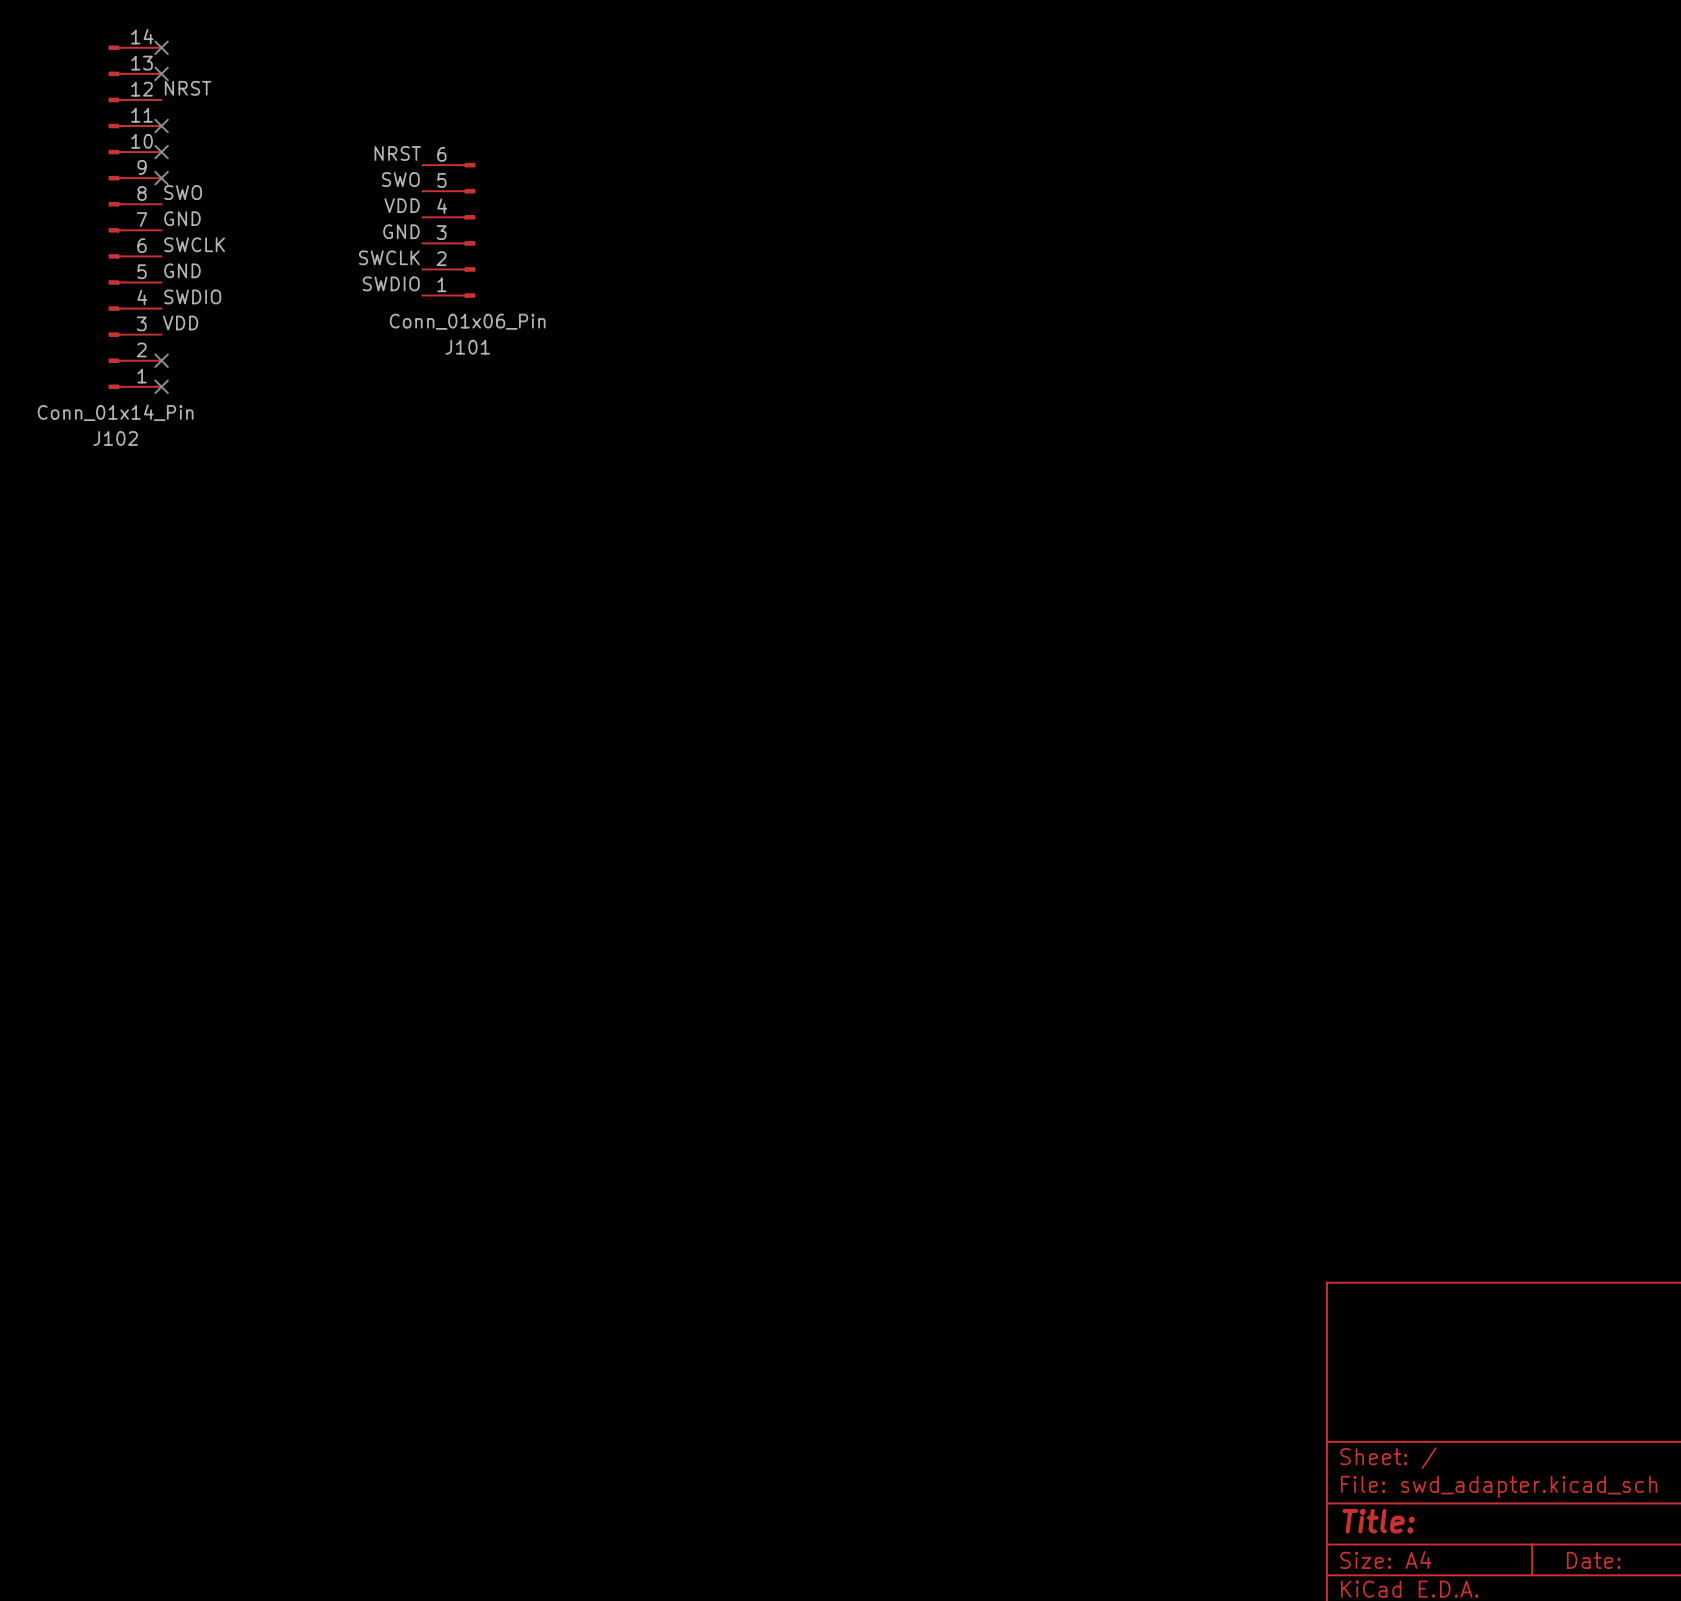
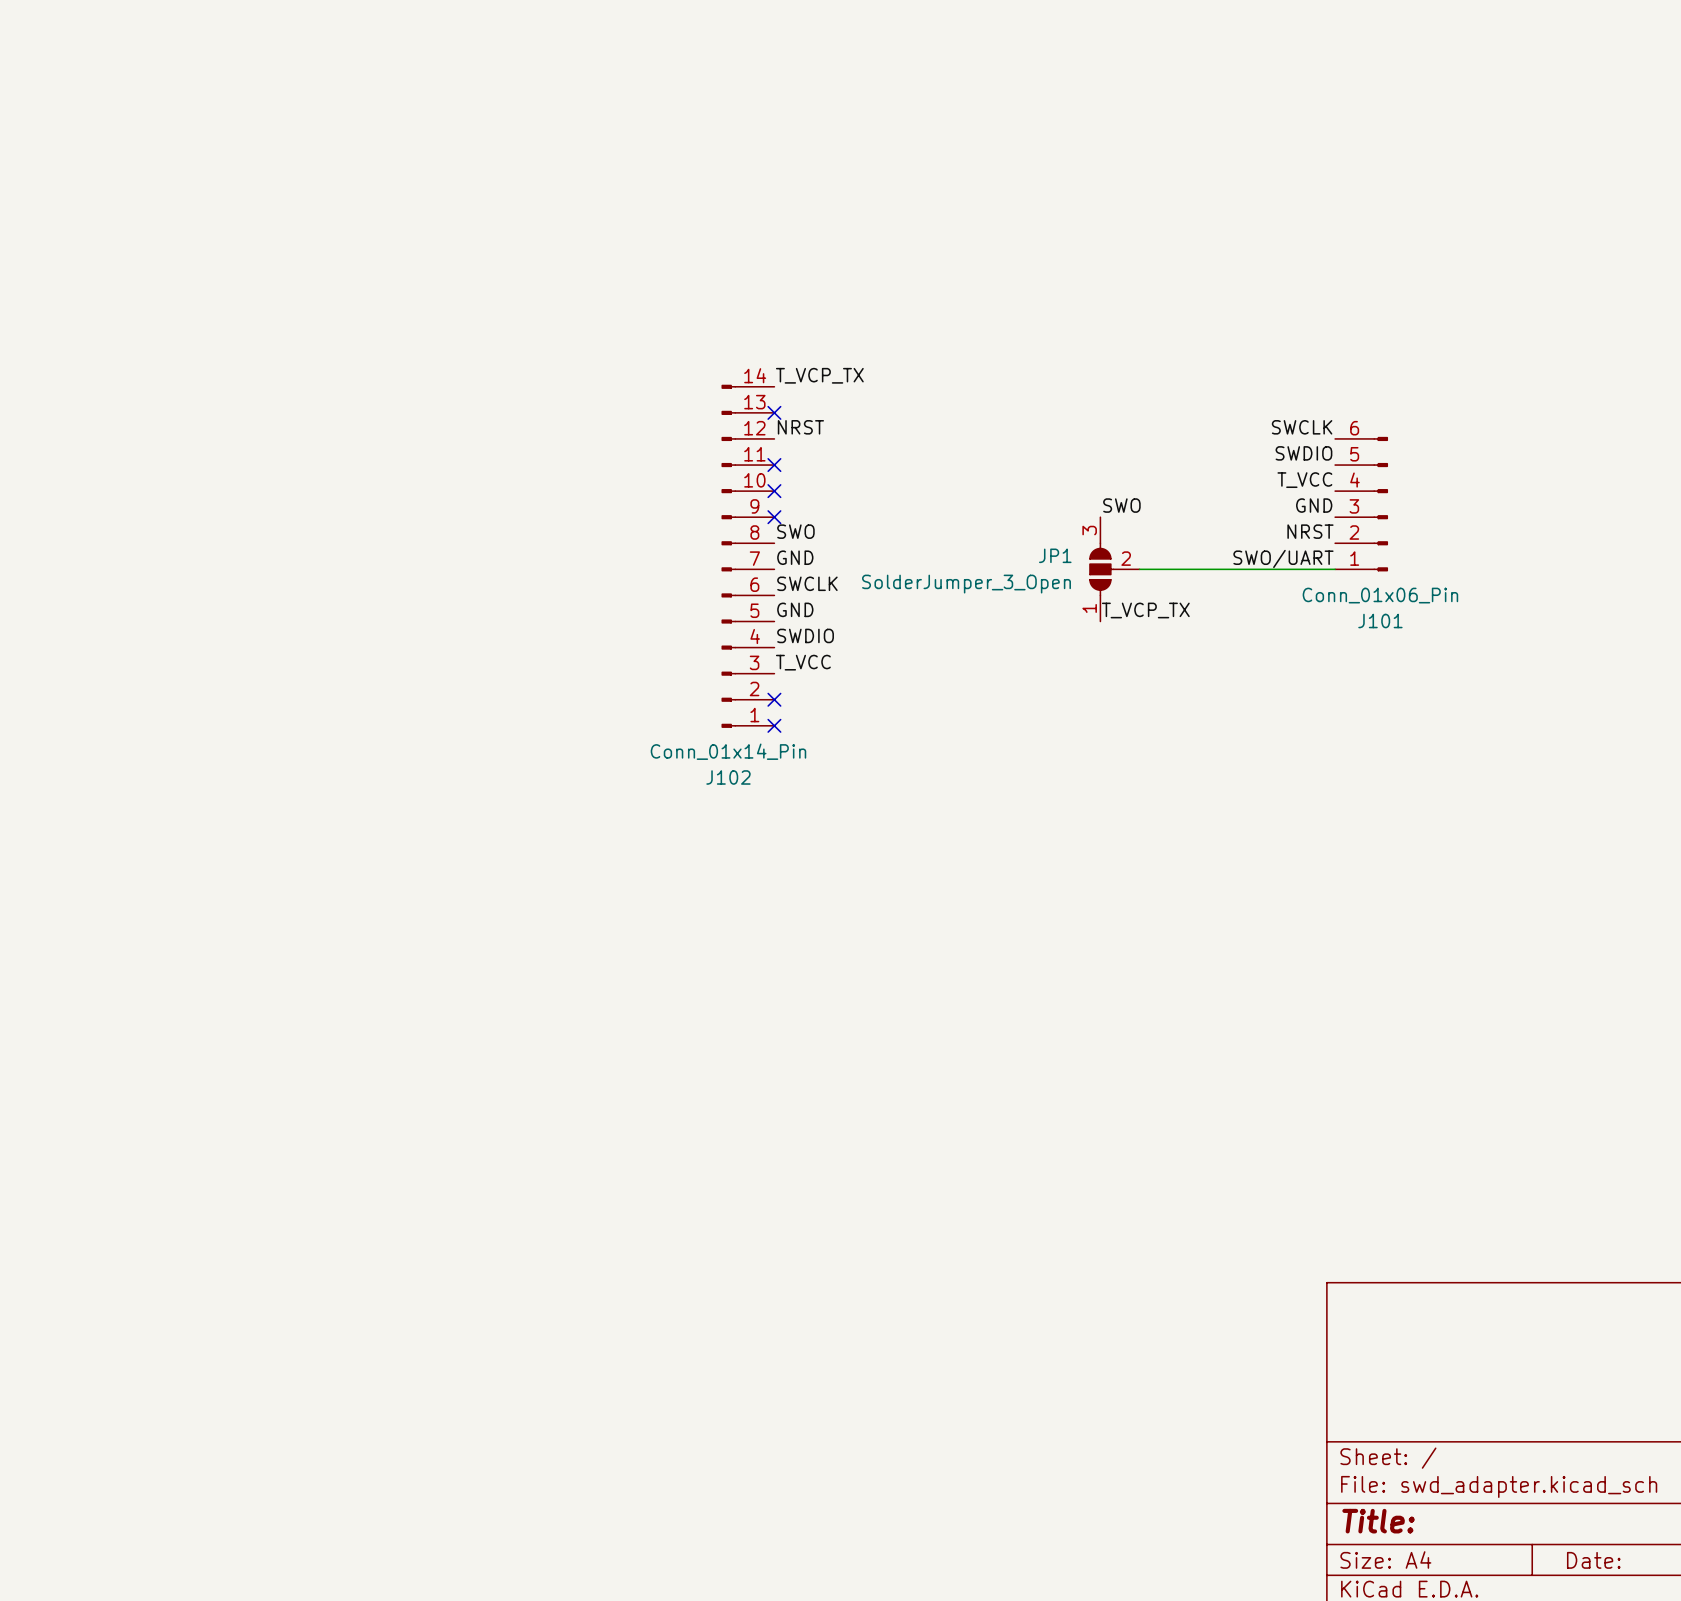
no-connect mark: (161, 47) -> none
no-connect mark: (161, 73) -> none
label: NRST (188, 88) -> none
no-connect mark: (161, 126) -> none
no-connect mark: (161, 152) -> none
label: NRST (397, 153) -> none
no-connect mark: (161, 178) -> none
label: SWO (400, 179) -> none
label: SWO (183, 192) -> none
label: VDD (402, 205) -> none
J102 position: (135, 217) -> (747, 556)
label: GND (182, 218) -> none
J101 position: (448, 230) -> (1361, 504)
label: GND (401, 231) -> none
label: SWCLK (194, 244) -> none
label: SWCLK (389, 257) -> none
label: GND (182, 270) -> none
label: SWDIO (391, 283) -> none
label: SWDIO (192, 296) -> none
label: VDD (180, 323) -> none
no-connect mark: (161, 360) -> none
label: none -> T_VCP_TX (819, 375)
no-connect mark: (161, 386) -> none
no-connect mark: none -> (774, 412)
label: none -> NRST (800, 427)
label: none -> SWCLK (1302, 427)
label: none -> SWDIO (1303, 453)
no-connect mark: none -> (774, 465)
label: none -> T_VCC (1304, 480)
no-connect mark: none -> (774, 491)
label: none -> SWO (1121, 505)
label: none -> GND (1314, 505)
no-connect mark: none -> (774, 517)
label: none -> SWO (795, 531)
label: none -> NRST (1310, 531)
label: none -> GND (795, 557)
label: none -> SWO/UART (1283, 558)
JP1: none -> SolderJumper_3_Open (1114, 569)
wire: none -> (1139, 569) (1335, 569)
label: none -> SWCLK (807, 583)
label: none -> GND (795, 609)
label: none -> T_VCP_TX (1145, 610)
label: none -> SWDIO (805, 635)
label: none -> T_VCC (803, 662)
no-connect mark: none -> (774, 699)
no-connect mark: none -> (774, 725)

